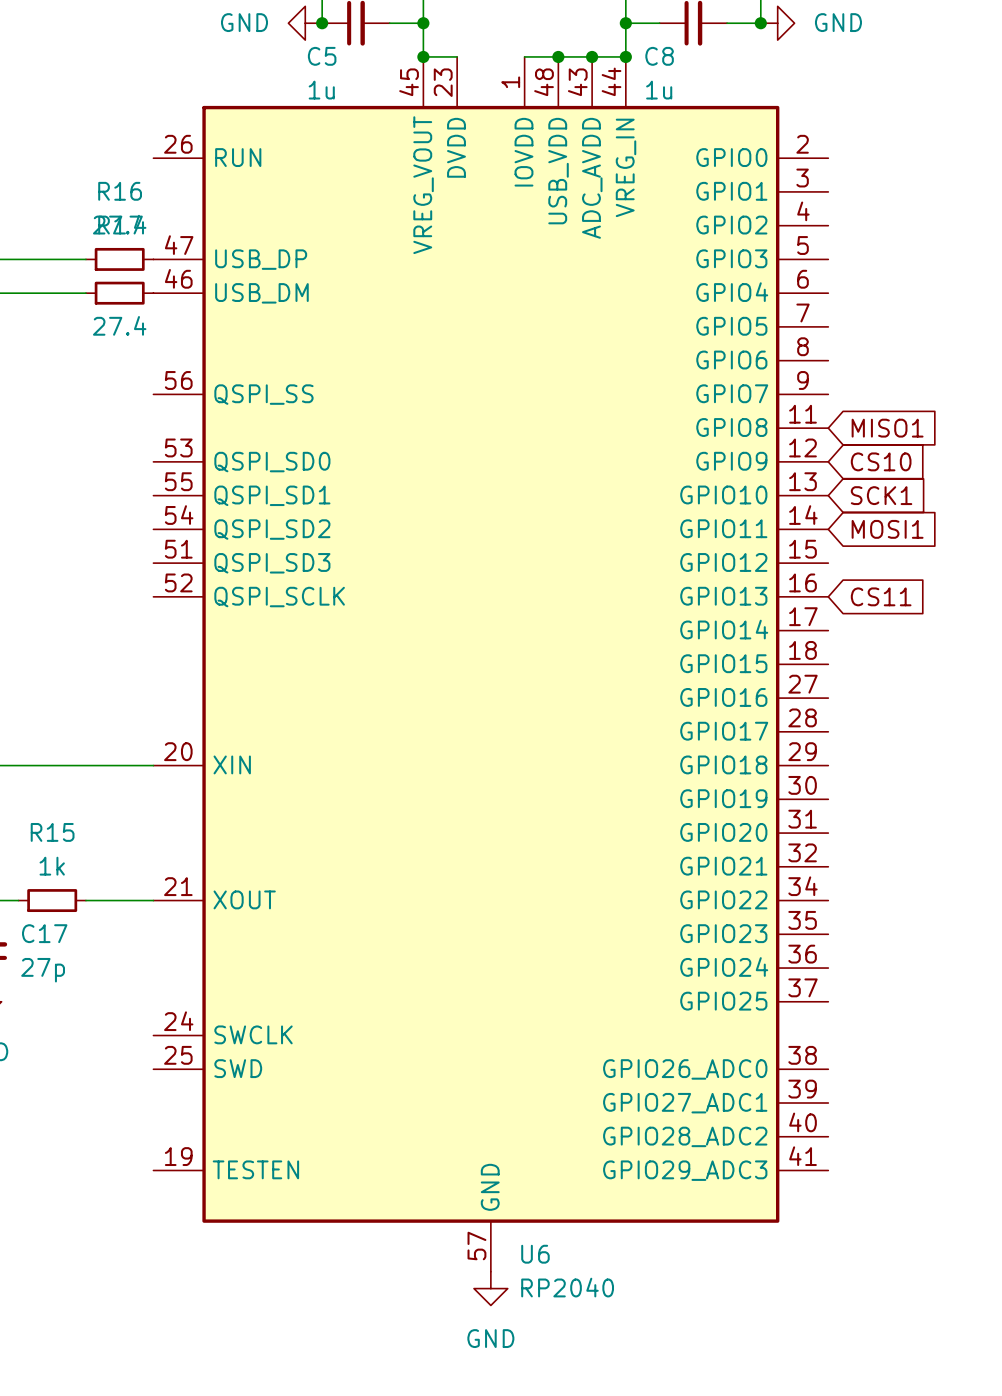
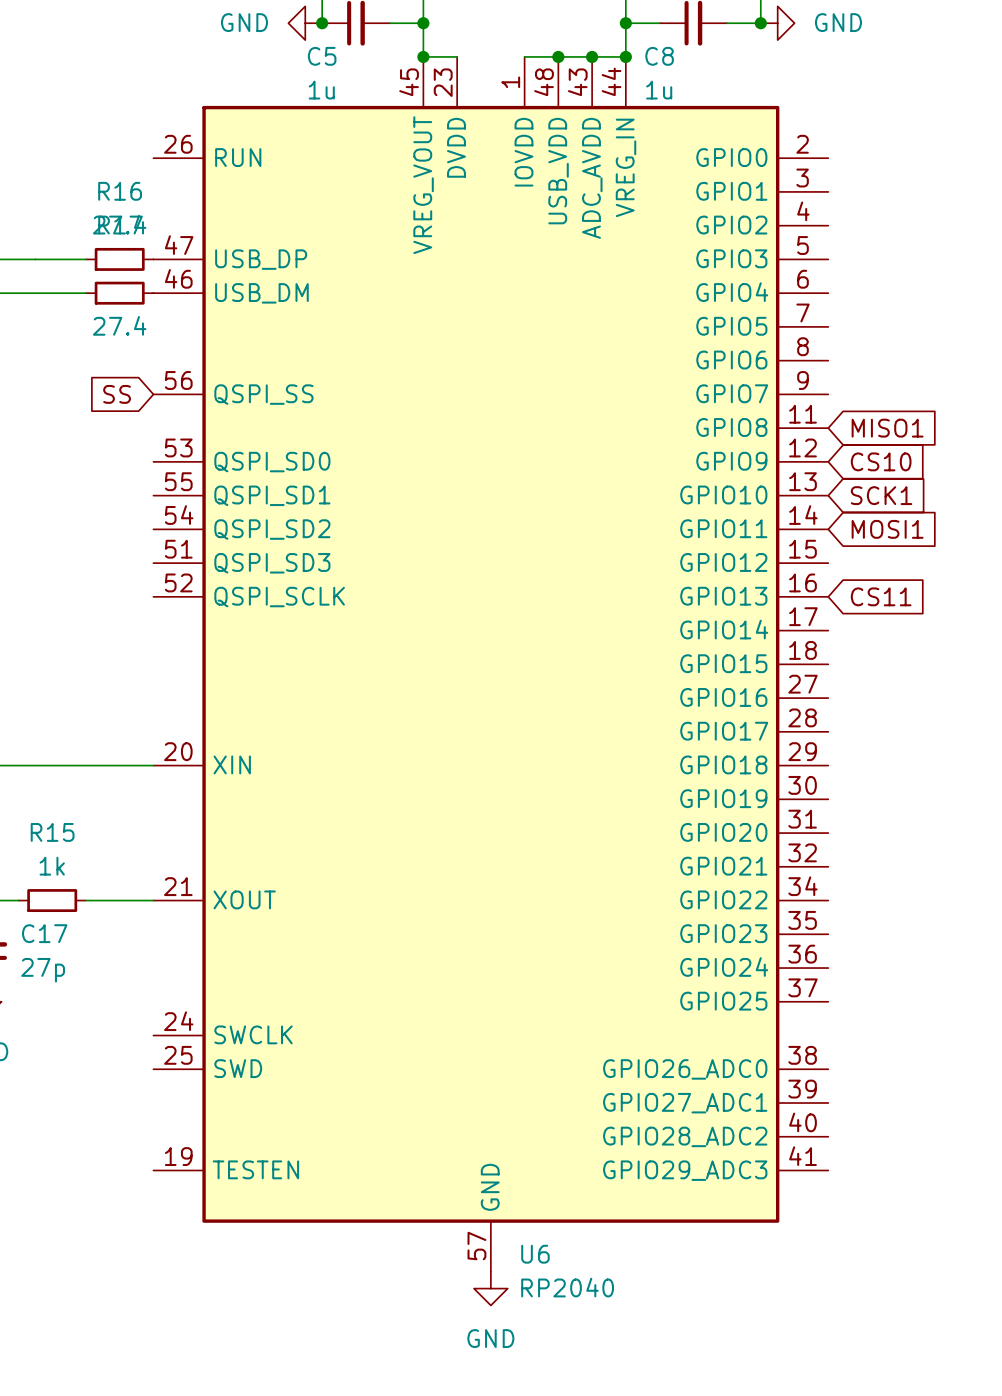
global label: none -> SS (117, 394)

